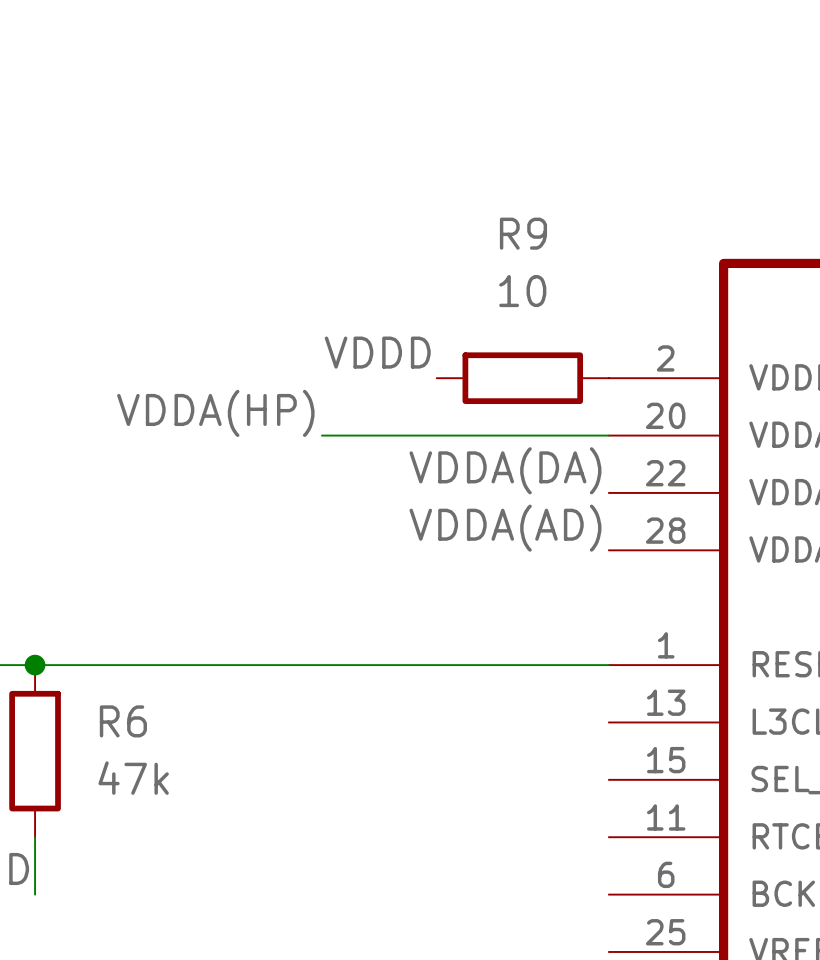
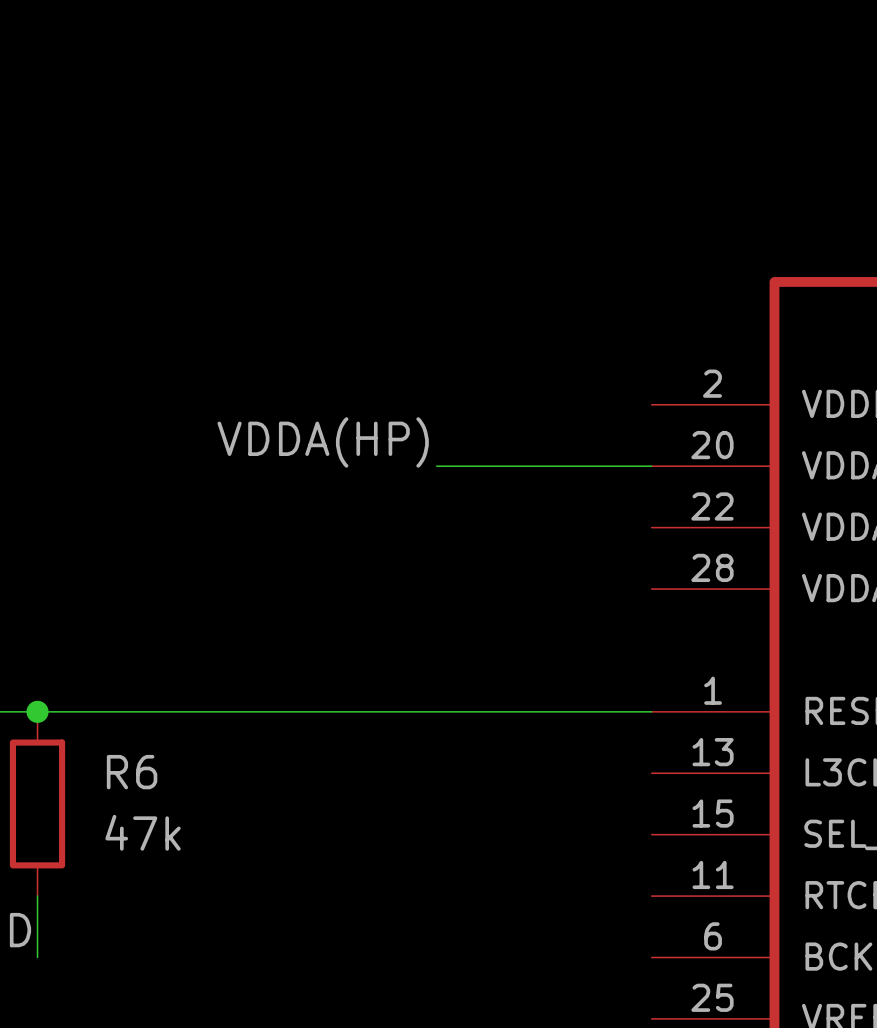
label: VDDD (377, 352) -> none
R9: 10 (522, 378) -> none
label position: VDDA(HP) (215, 413) -> VDDA(HP) (323, 442)
wire: (321, 435) (408, 435) -> none
label: VDDA(DA) (505, 470) -> none
label: VDDA(AD) (505, 528) -> none

